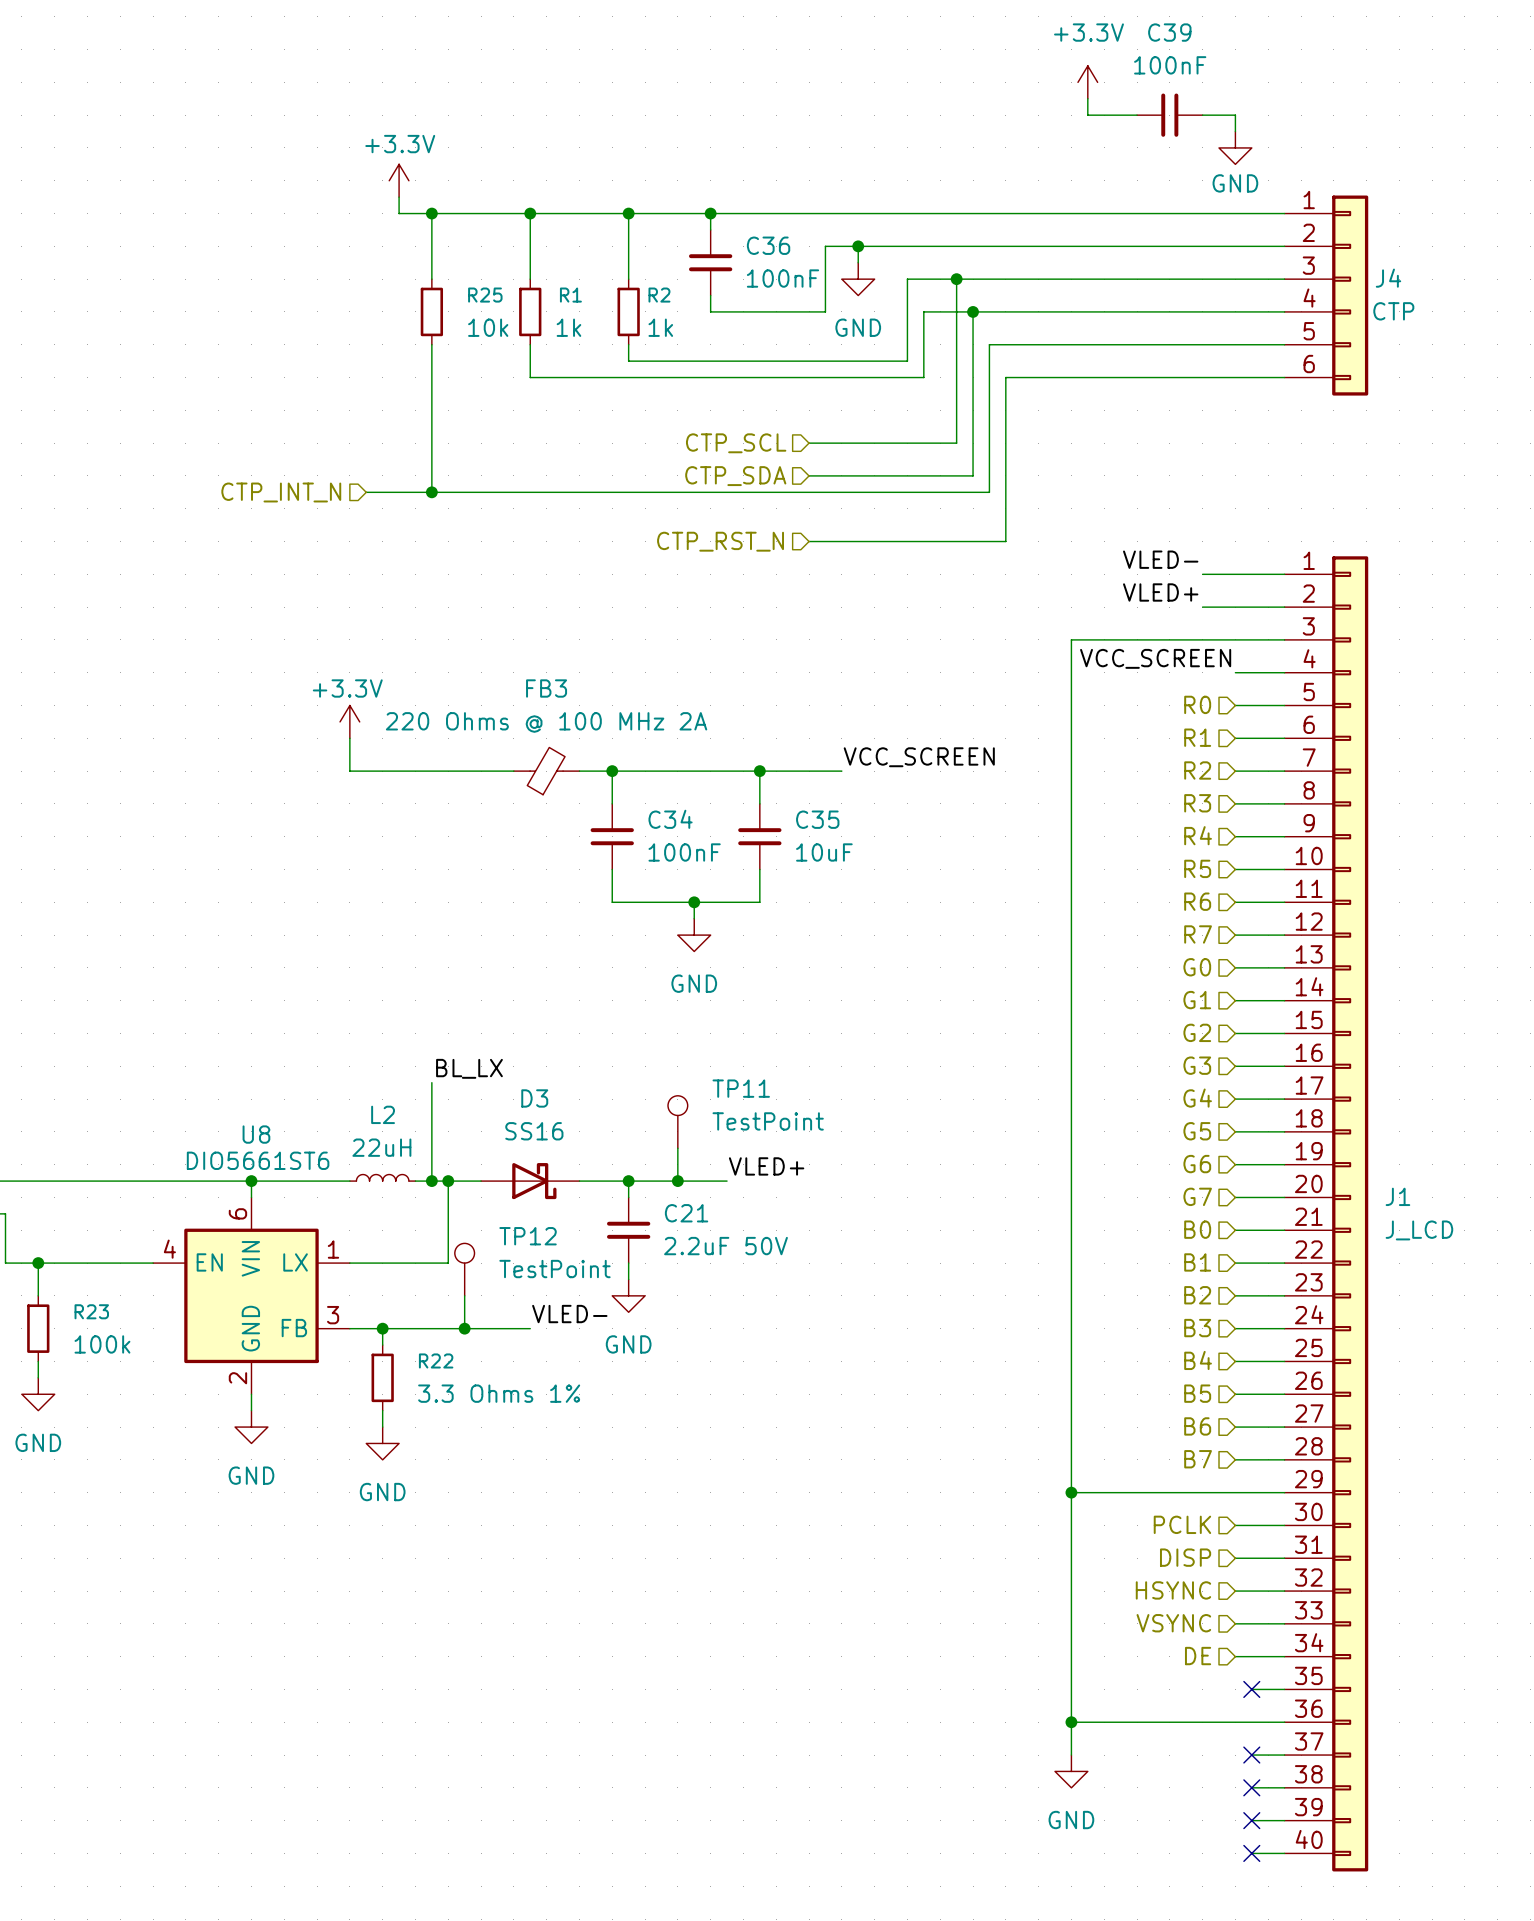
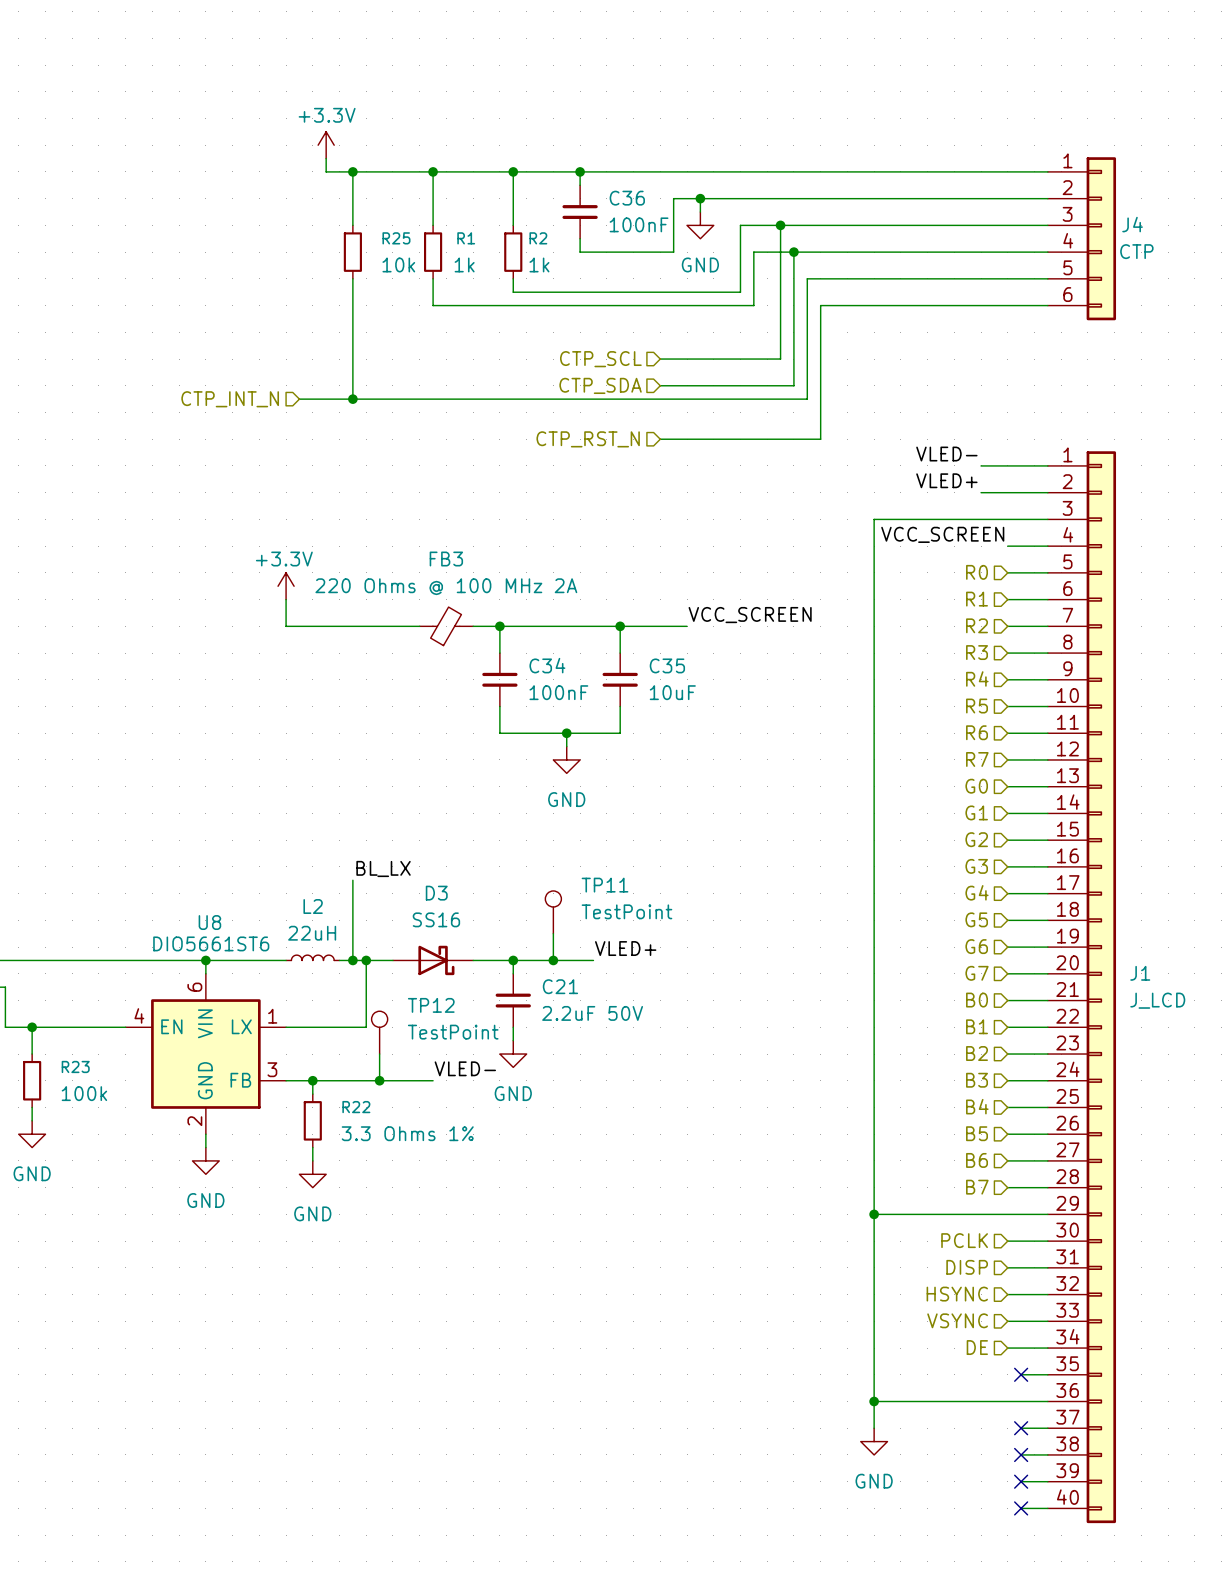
power symbol: +3.3V (1087, 82) -> none
wire: (1087, 98) (1087, 115) (1137, 115) -> none
C39: 100nF (1169, 115) -> none
wire: (1202, 115) (1235, 115) (1235, 131) -> none
power symbol: GND (1235, 147) -> none

